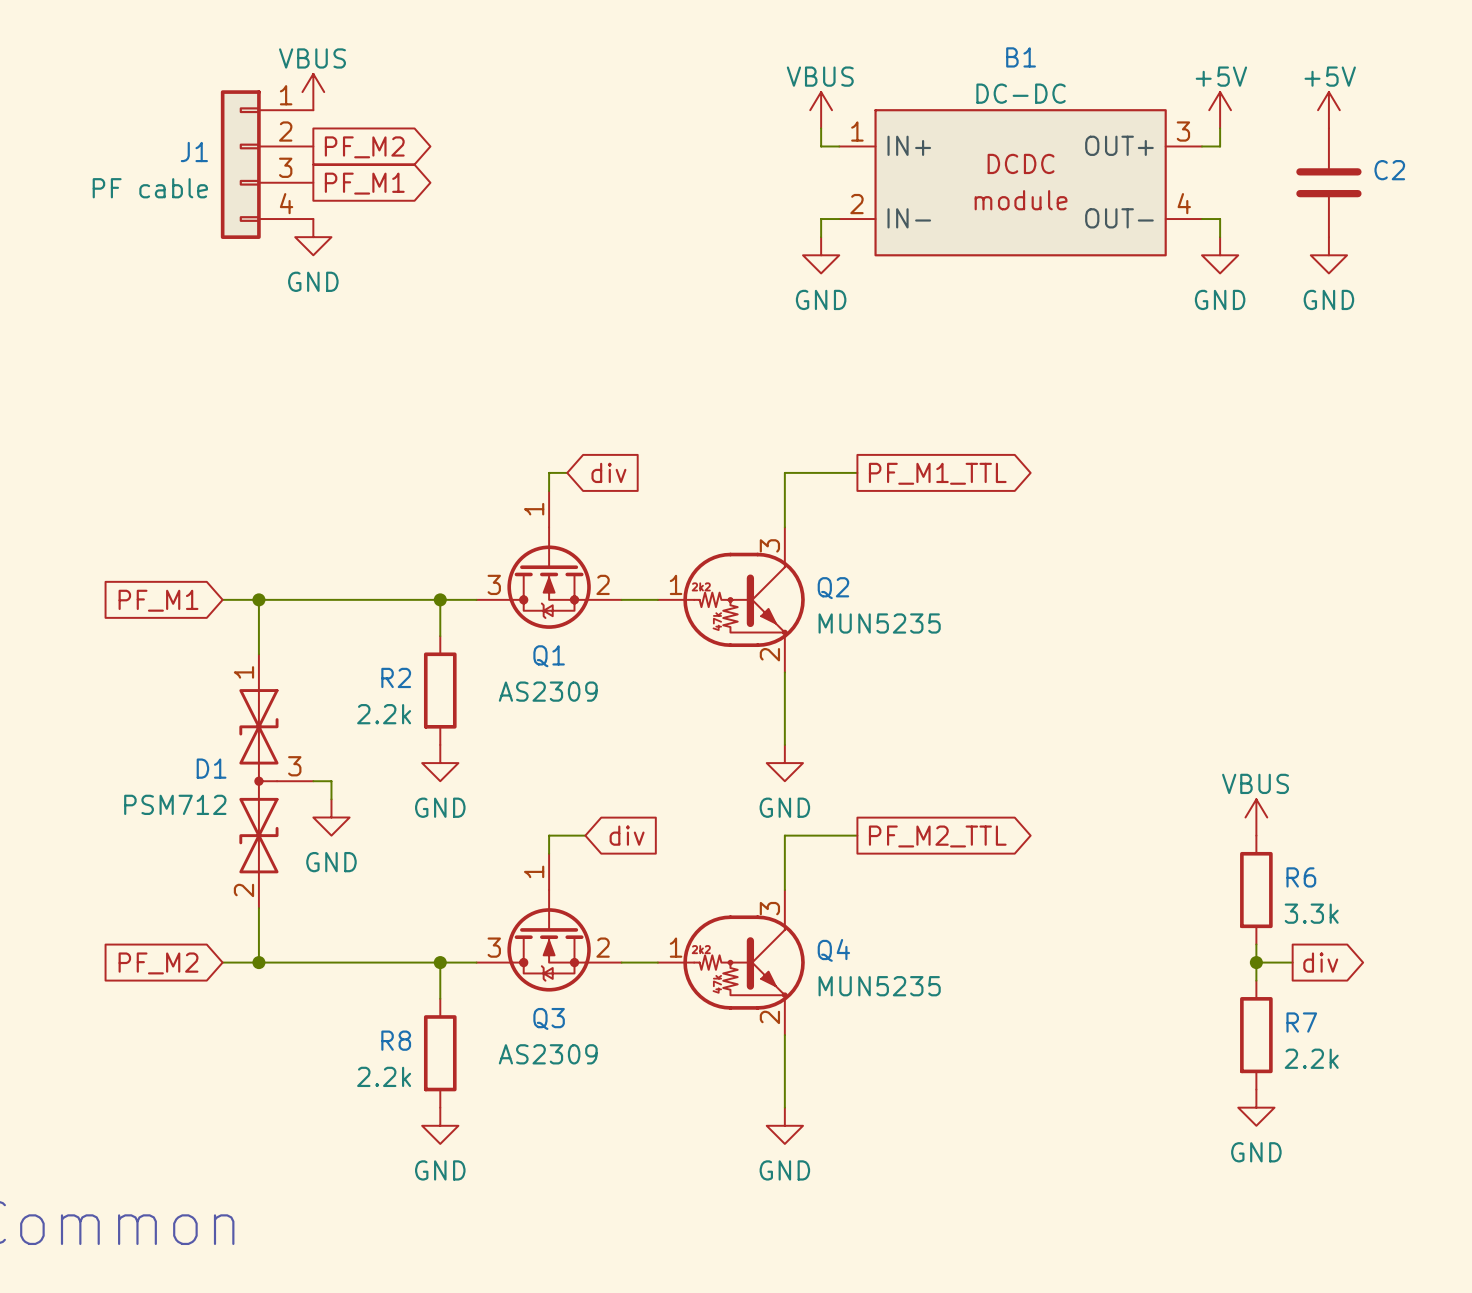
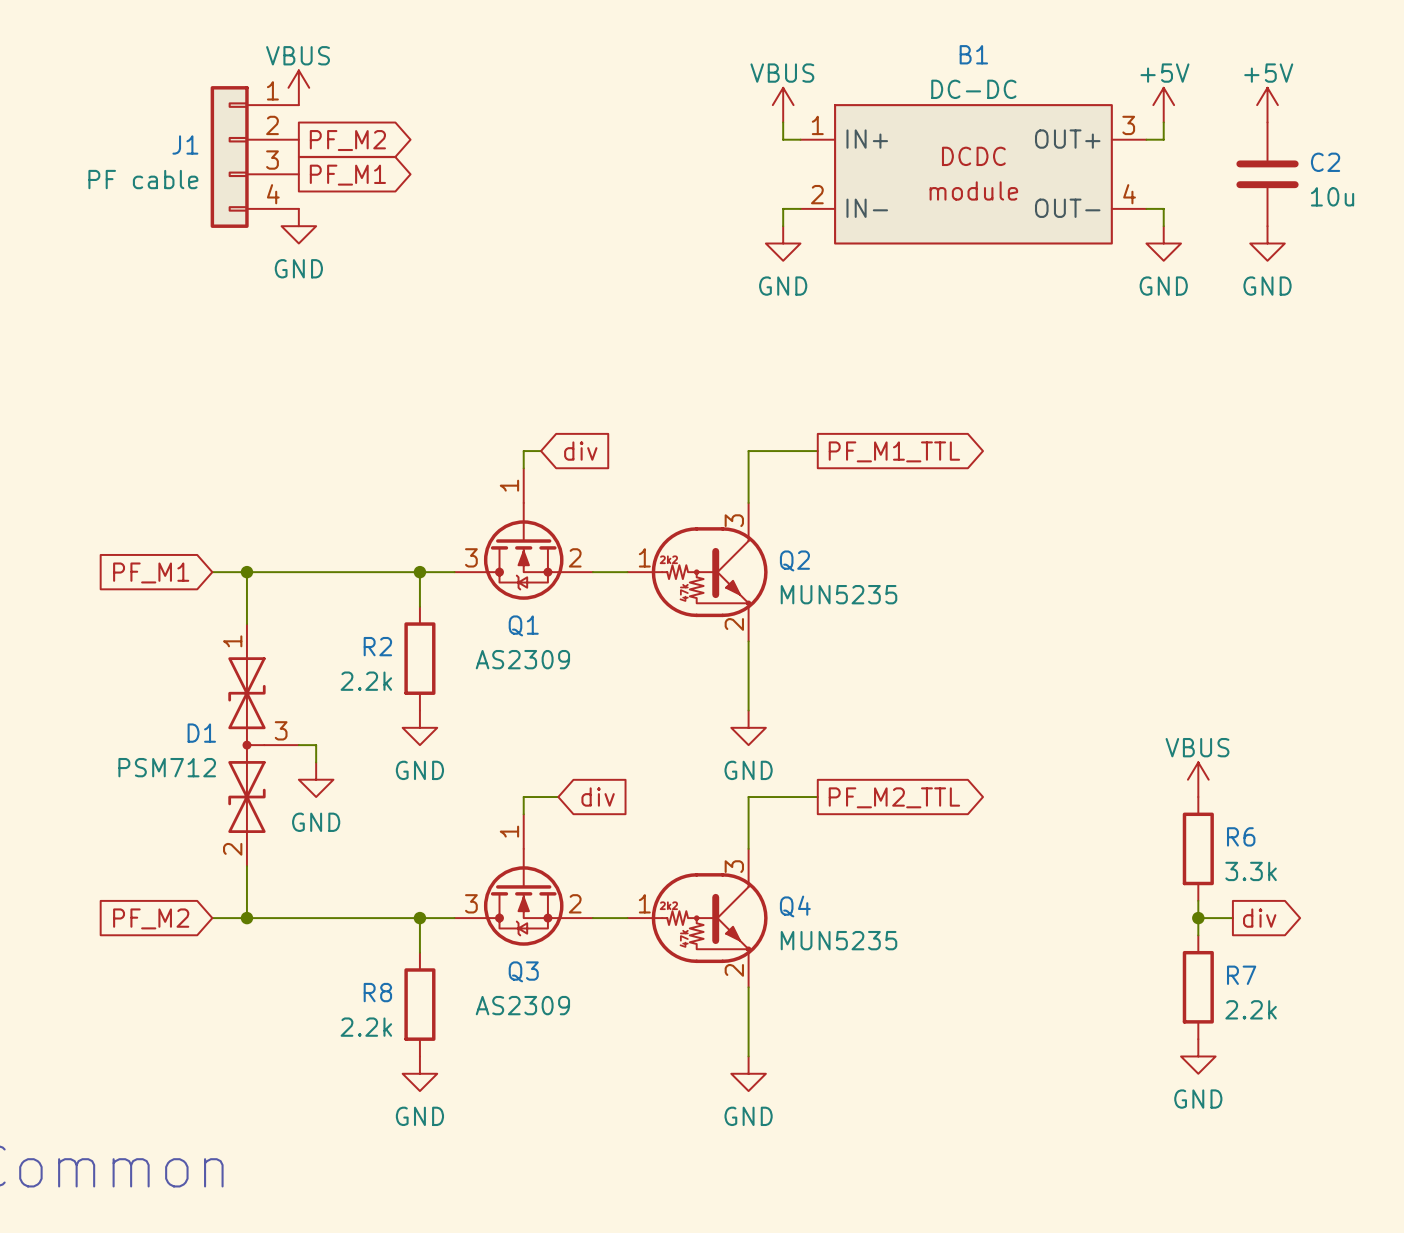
C2 value: none -> 10u (1332, 196)

